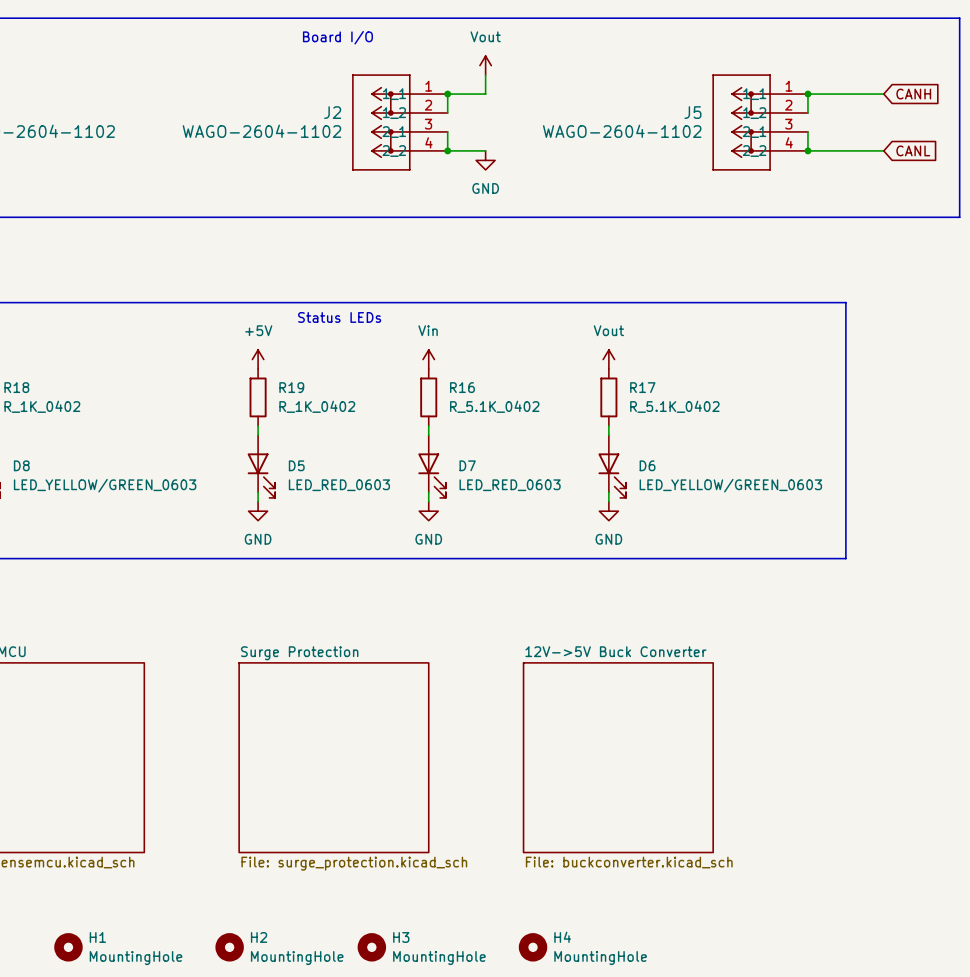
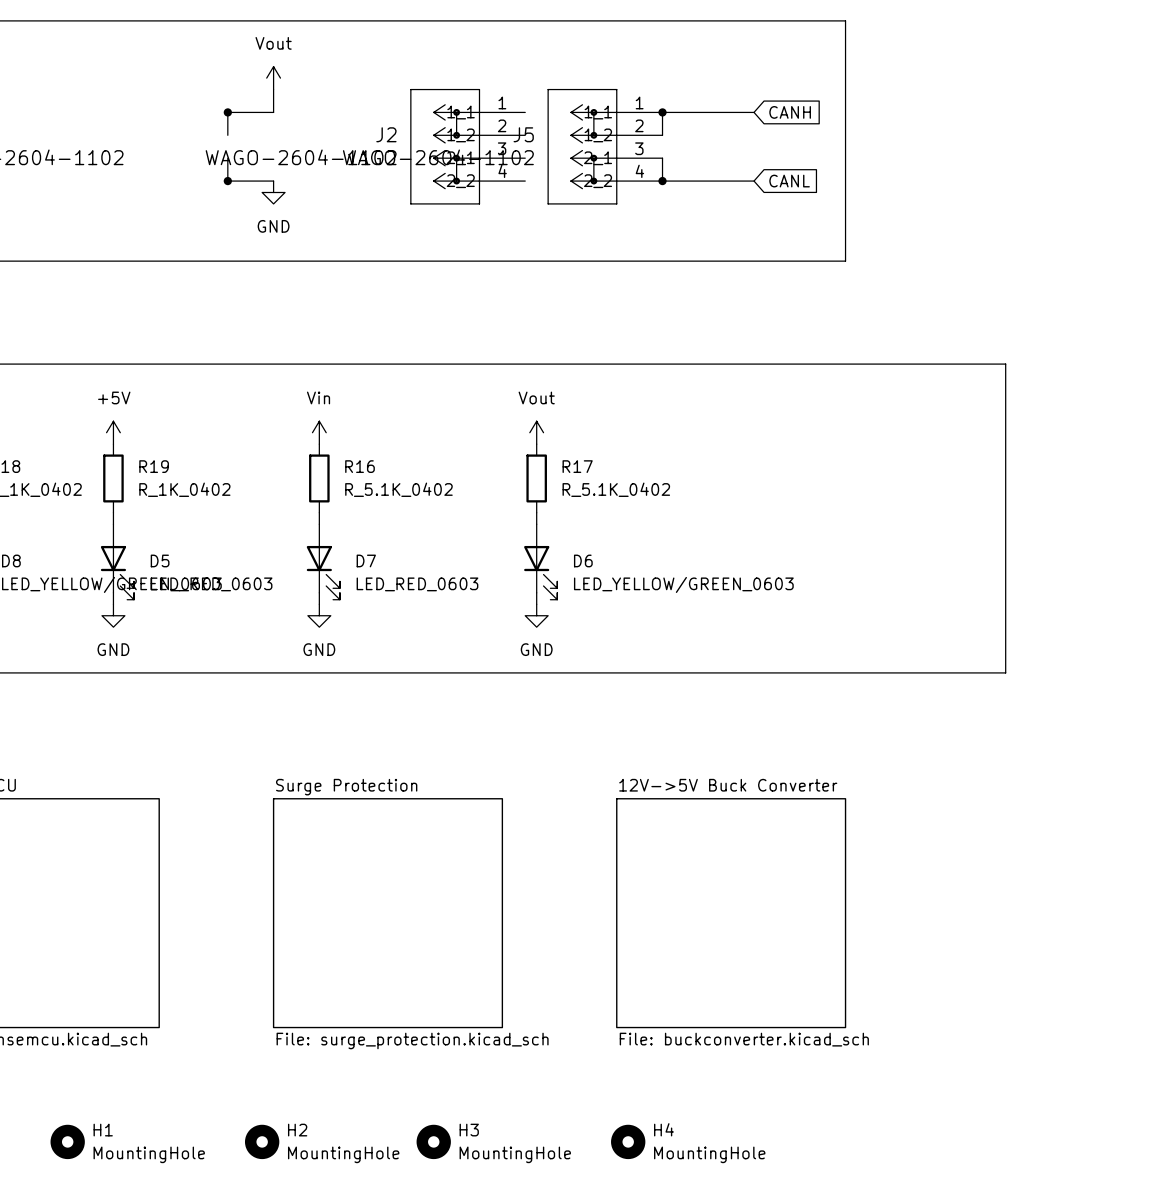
line: (713, 18) (959, 18) (959, 217) (713, 217) -> (845, 20) (845, 261)
text: Board I/O (337, 37) -> none
power symbol: none -> Vout (273, 78)
power symbol: Vout (485, 65) -> none
wire: none -> (273, 89) (273, 112) (227, 112) (227, 135)
wire: (485, 75) (485, 94) (447, 94) (447, 113) -> none
junction: none -> (227, 112)
junction: (447, 94) -> none
junction: none -> (662, 112)
wire: none -> (754, 112) (662, 112) (662, 135)
global label: none -> CANH (790, 112)
junction: (807, 94) -> none
wire: (883, 94) (807, 94) (807, 113) -> none
global label: CANH (913, 94) -> none
J5 position: (760, 122) -> (605, 146)
wire: none -> (227, 158) (227, 181) (273, 181)
wire: (447, 131) (447, 150) (485, 150) -> none
wire: none -> (662, 158) (662, 181) (754, 181)
wire: (807, 131) (807, 150) (883, 150) -> none
junction: none -> (227, 181)
junction: (447, 150) -> none
junction: none -> (662, 181)
global label: none -> CANL (789, 181)
junction: (807, 150) -> none
global label: CANL (913, 150) -> none
power symbol: none -> GND (273, 192)
power symbol: GND (485, 160) -> none
text: Status LEDs (339, 317) -> none
power symbol position: +5V (258, 359) -> +5V (113, 432)
power symbol position: Vin (428, 359) -> Vin (319, 432)
power symbol: none -> Vout (536, 432)
power symbol: Vout (608, 359) -> none
R19 position: (258, 397) -> (113, 478)
R16 position: (428, 397) -> (319, 478)
R17 position: (608, 397) -> (536, 478)
wire: (258, 425) (258, 435) -> (113, 512) (113, 524)
wire: (428, 425) (428, 435) -> (319, 512) (319, 524)
wire: (608, 425) (608, 435) -> (536, 512) (536, 524)
D5 position: (261, 466) -> (117, 561)
D7 position: (432, 466) -> (323, 561)
D6 position: (612, 466) -> (540, 561)
wire: (258, 492) (258, 501) -> (113, 592) (113, 604)
wire: (428, 492) (428, 501) -> (319, 592) (319, 604)
wire: (608, 492) (608, 501) -> (536, 592) (536, 604)
power symbol: none -> GND (113, 615)
power symbol position: GND (258, 511) -> GND (319, 615)
power symbol position: GND (428, 511) -> GND (536, 615)
power symbol: GND (608, 511) -> none

